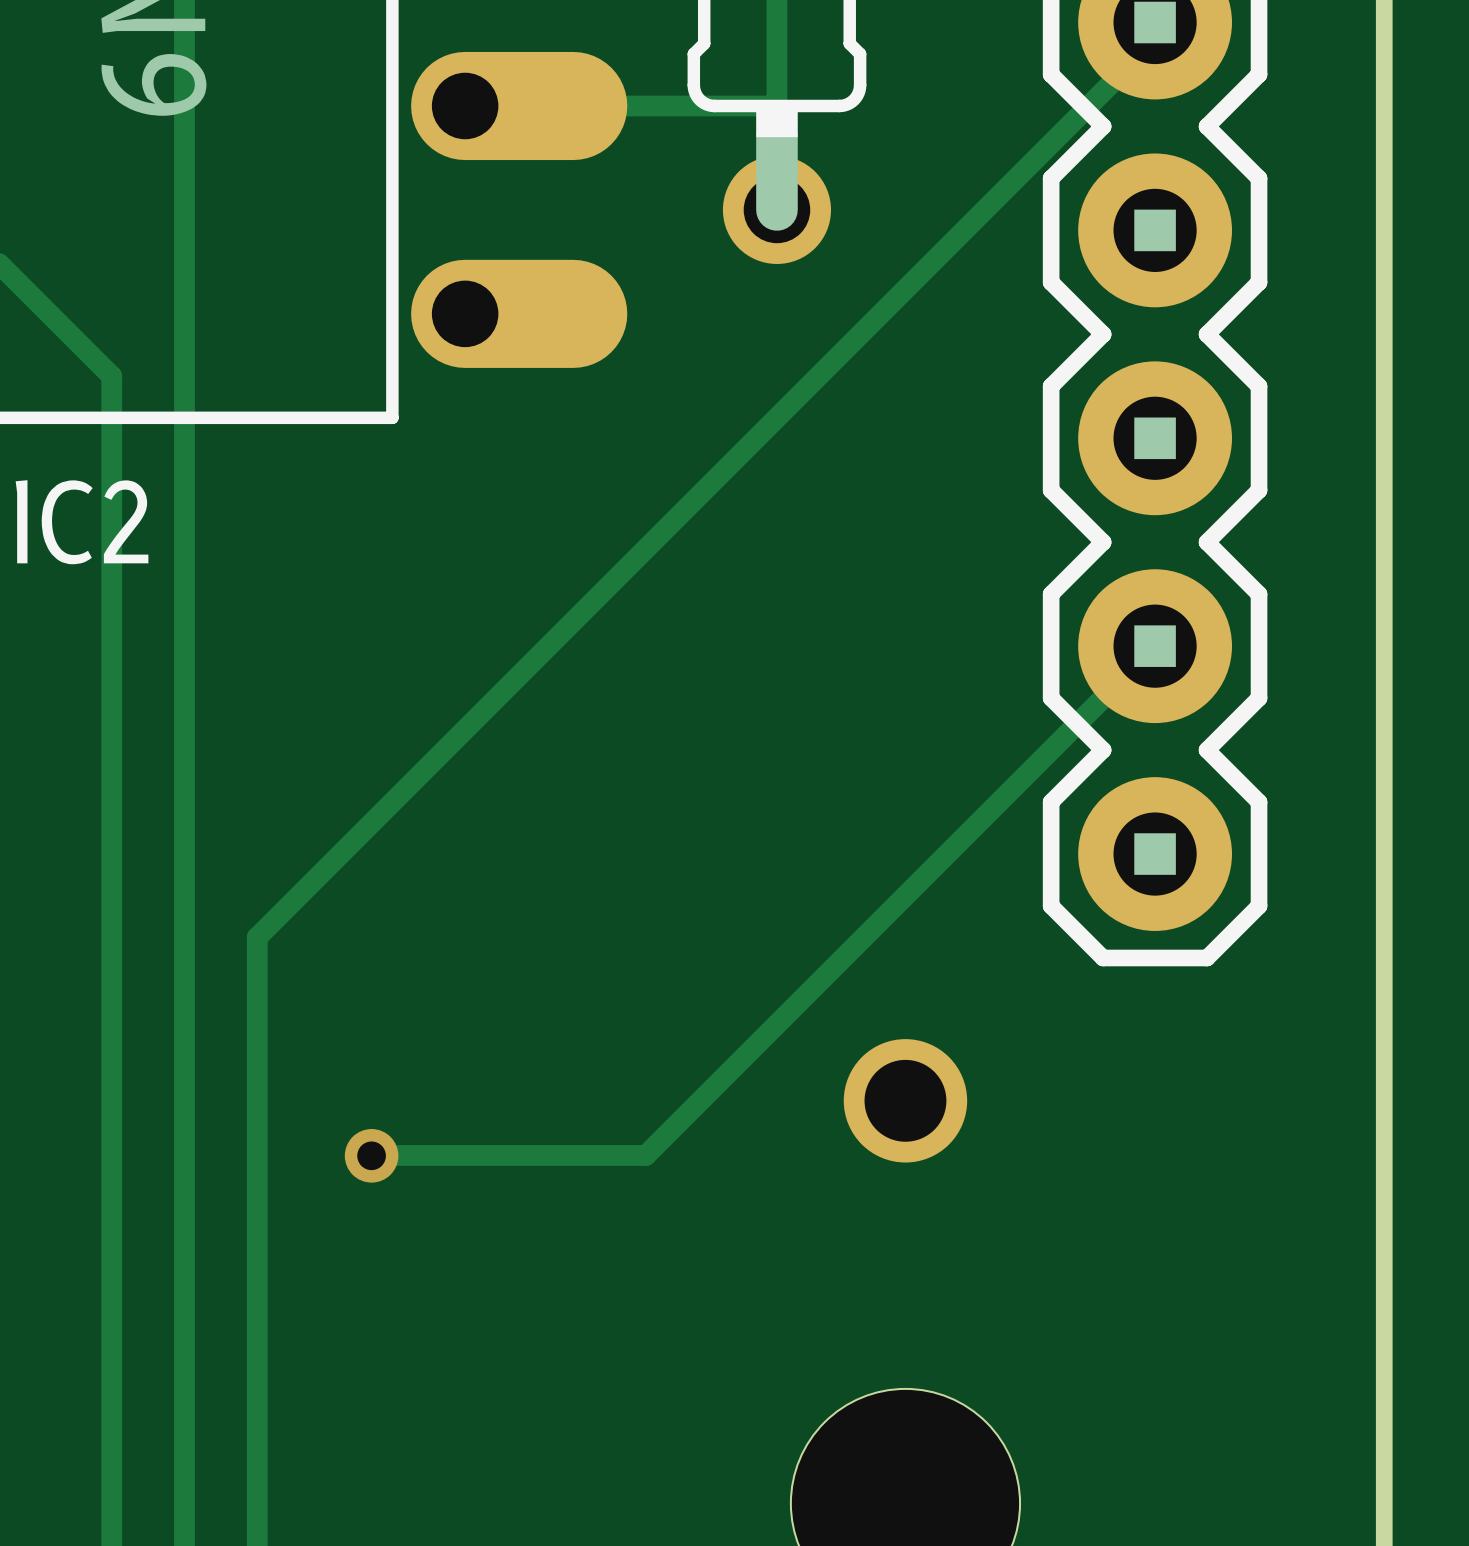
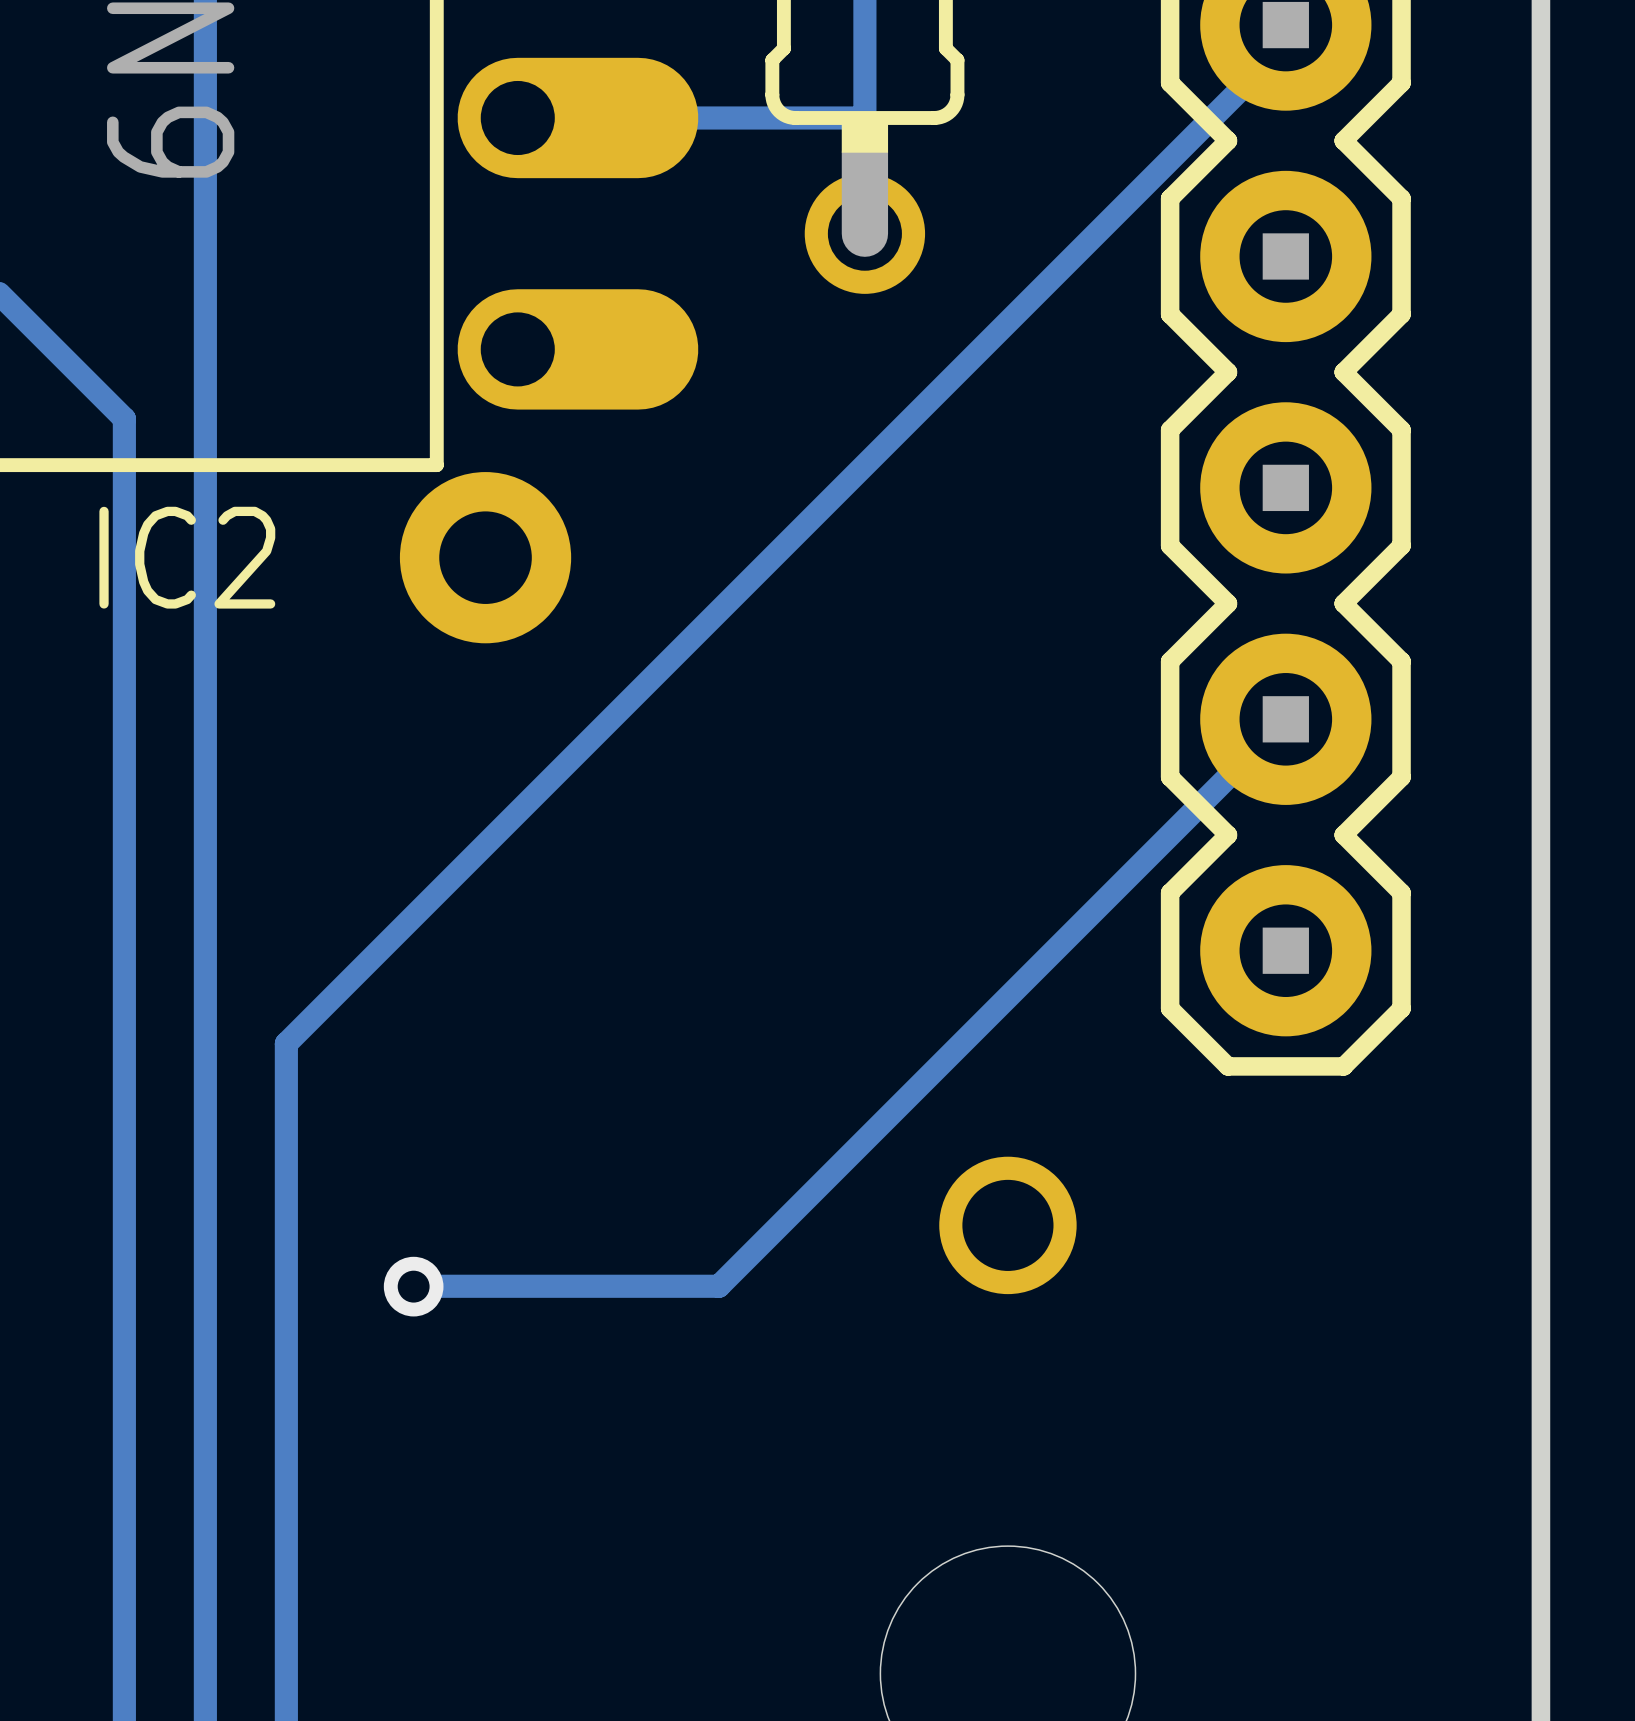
part: none -> (485, 557)
IC2 name position: IC2 (82, 522) -> IC2 (187, 557)

